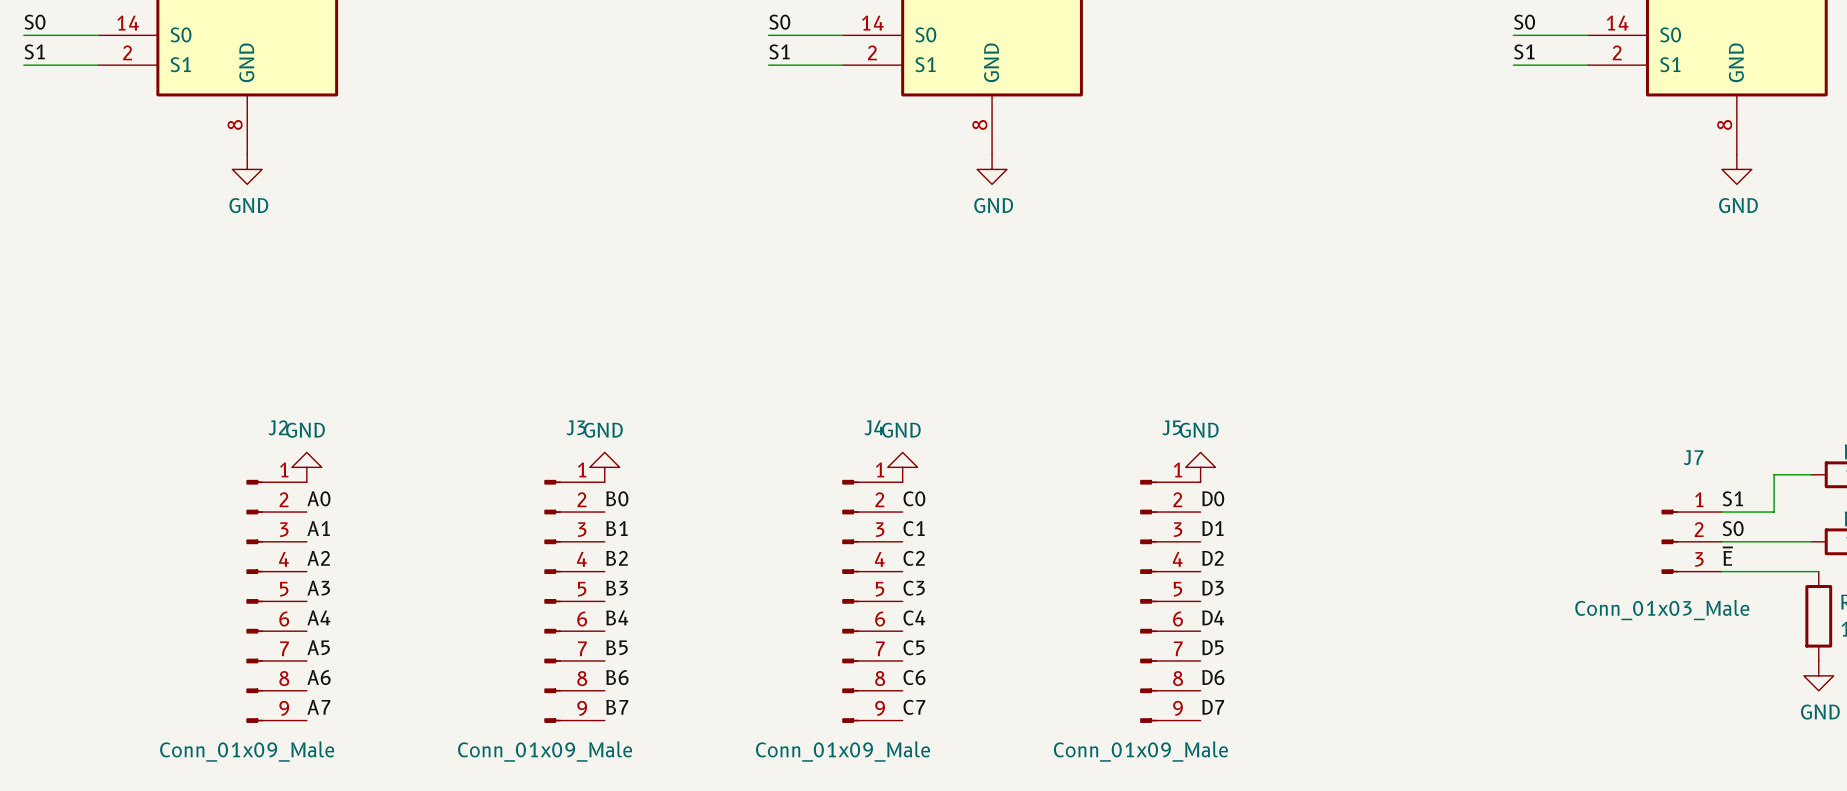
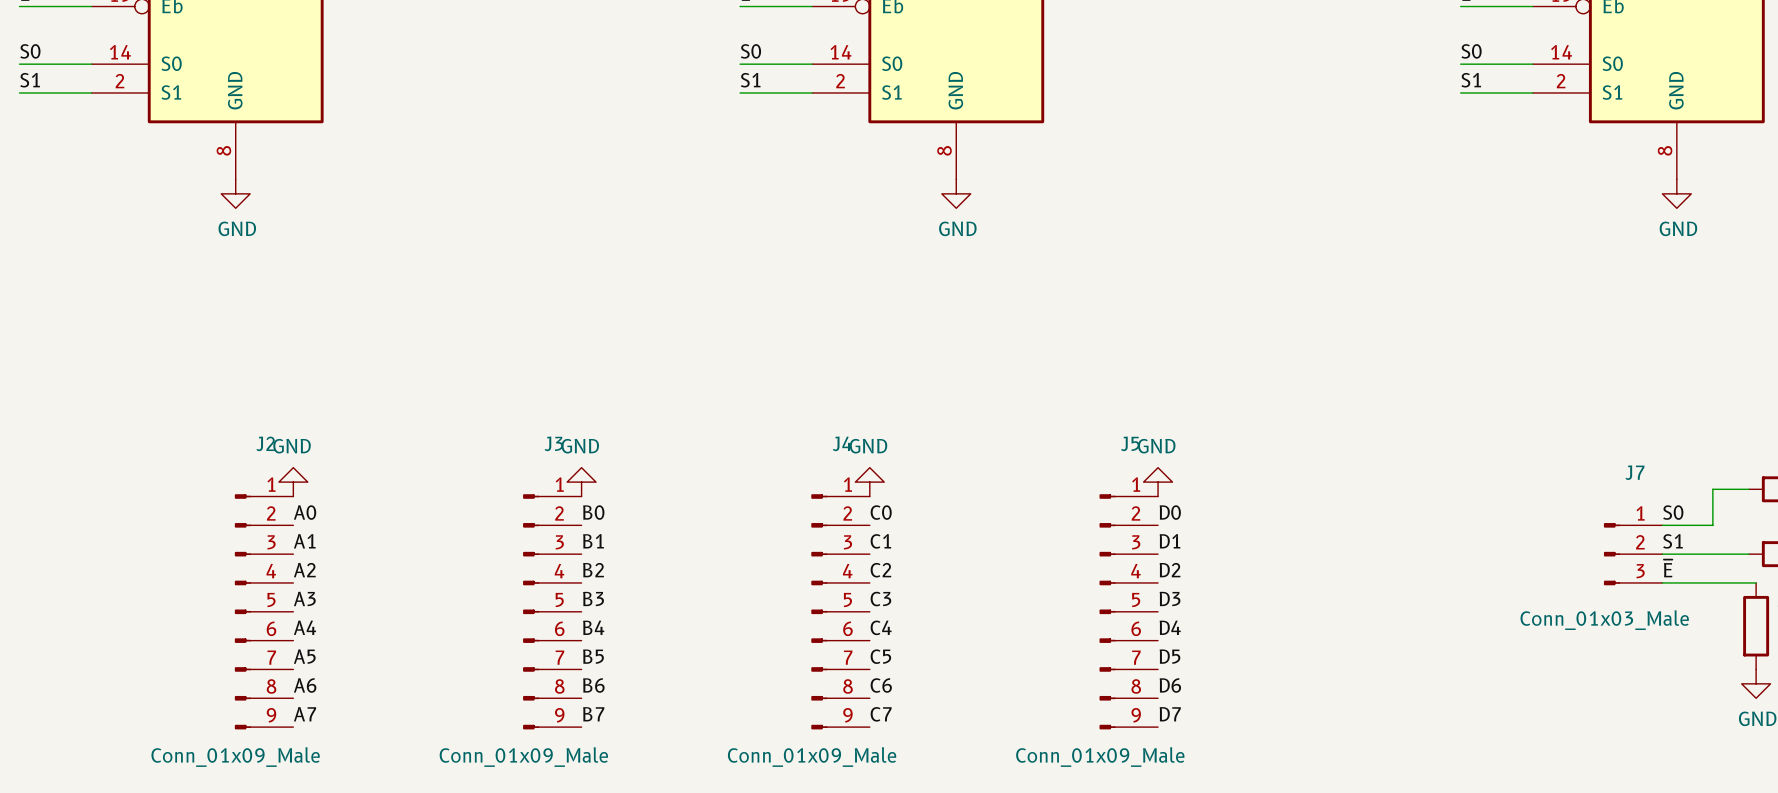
label: S1 (1732, 498) -> S0 (1673, 512)
label: S0 (1733, 528) -> S1 (1673, 541)

